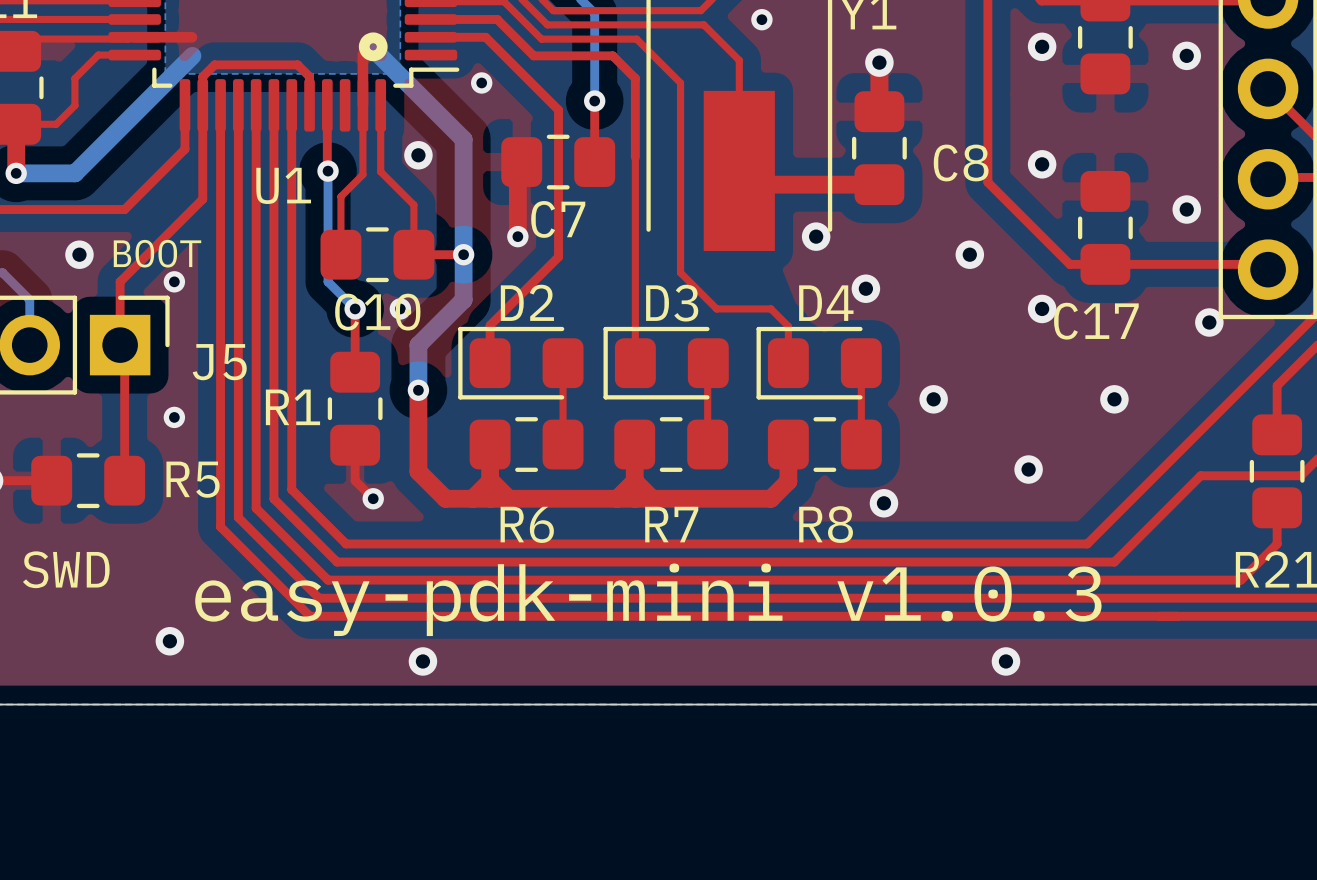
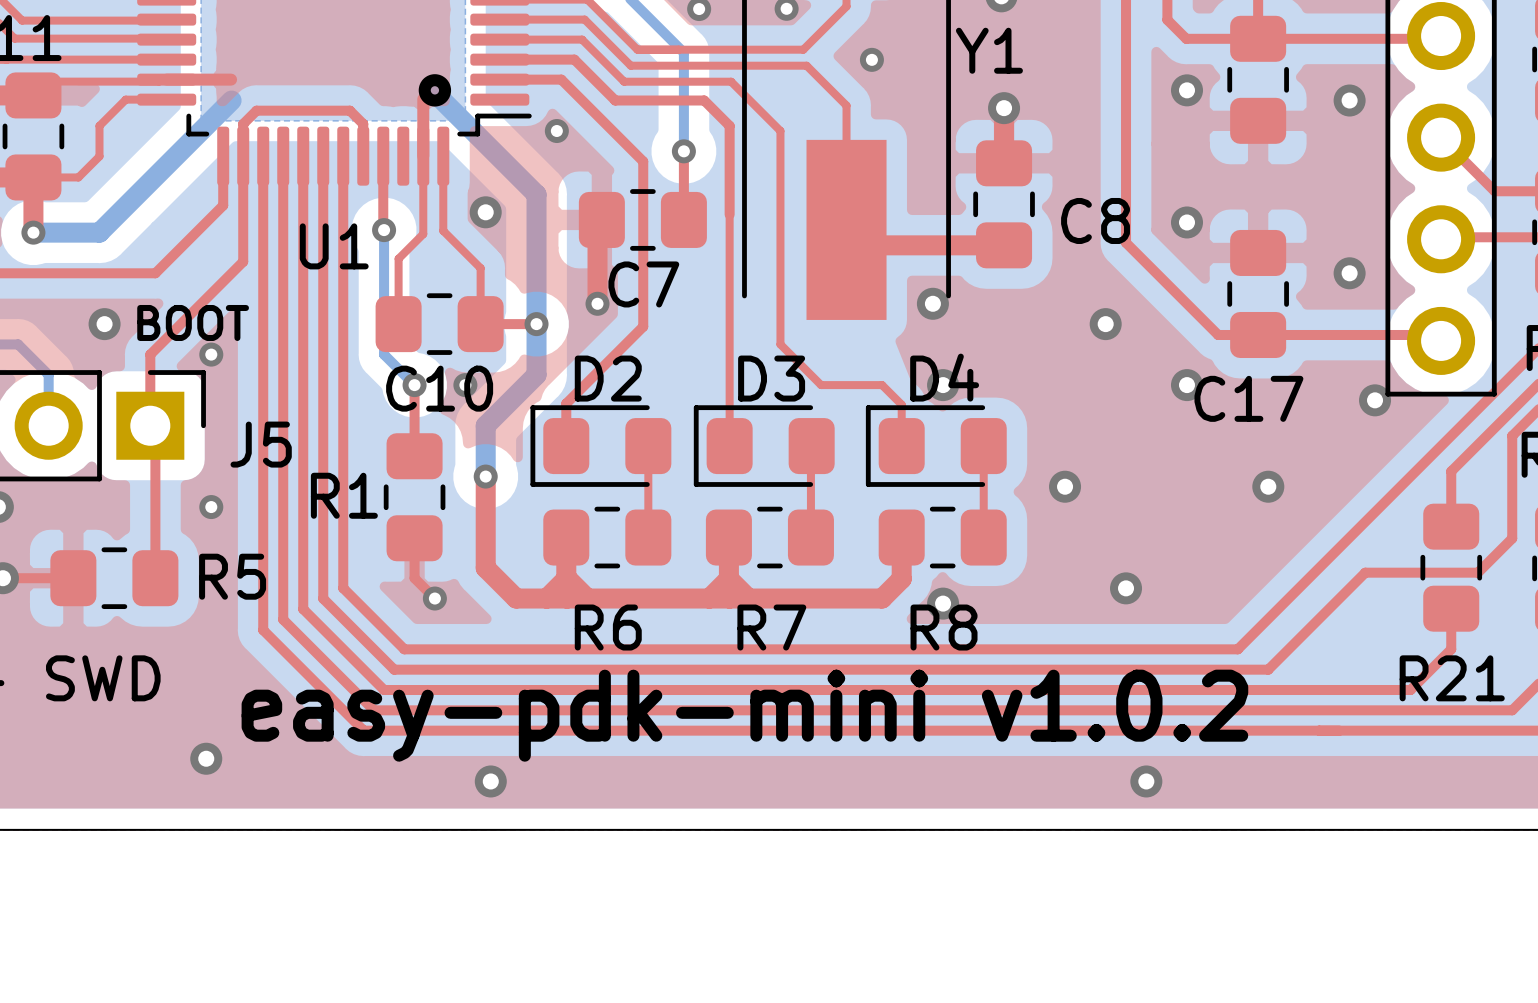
via position: (865, 288) -> (943, 385)
via position: (1028, 469) -> (1126, 588)
via: none -> (943, 603)
via: (883, 503) -> none
text: easy-pdk-mini v1.0.3 (648, 599) -> easy-pdk-mini v1.0.2 (744, 715)

